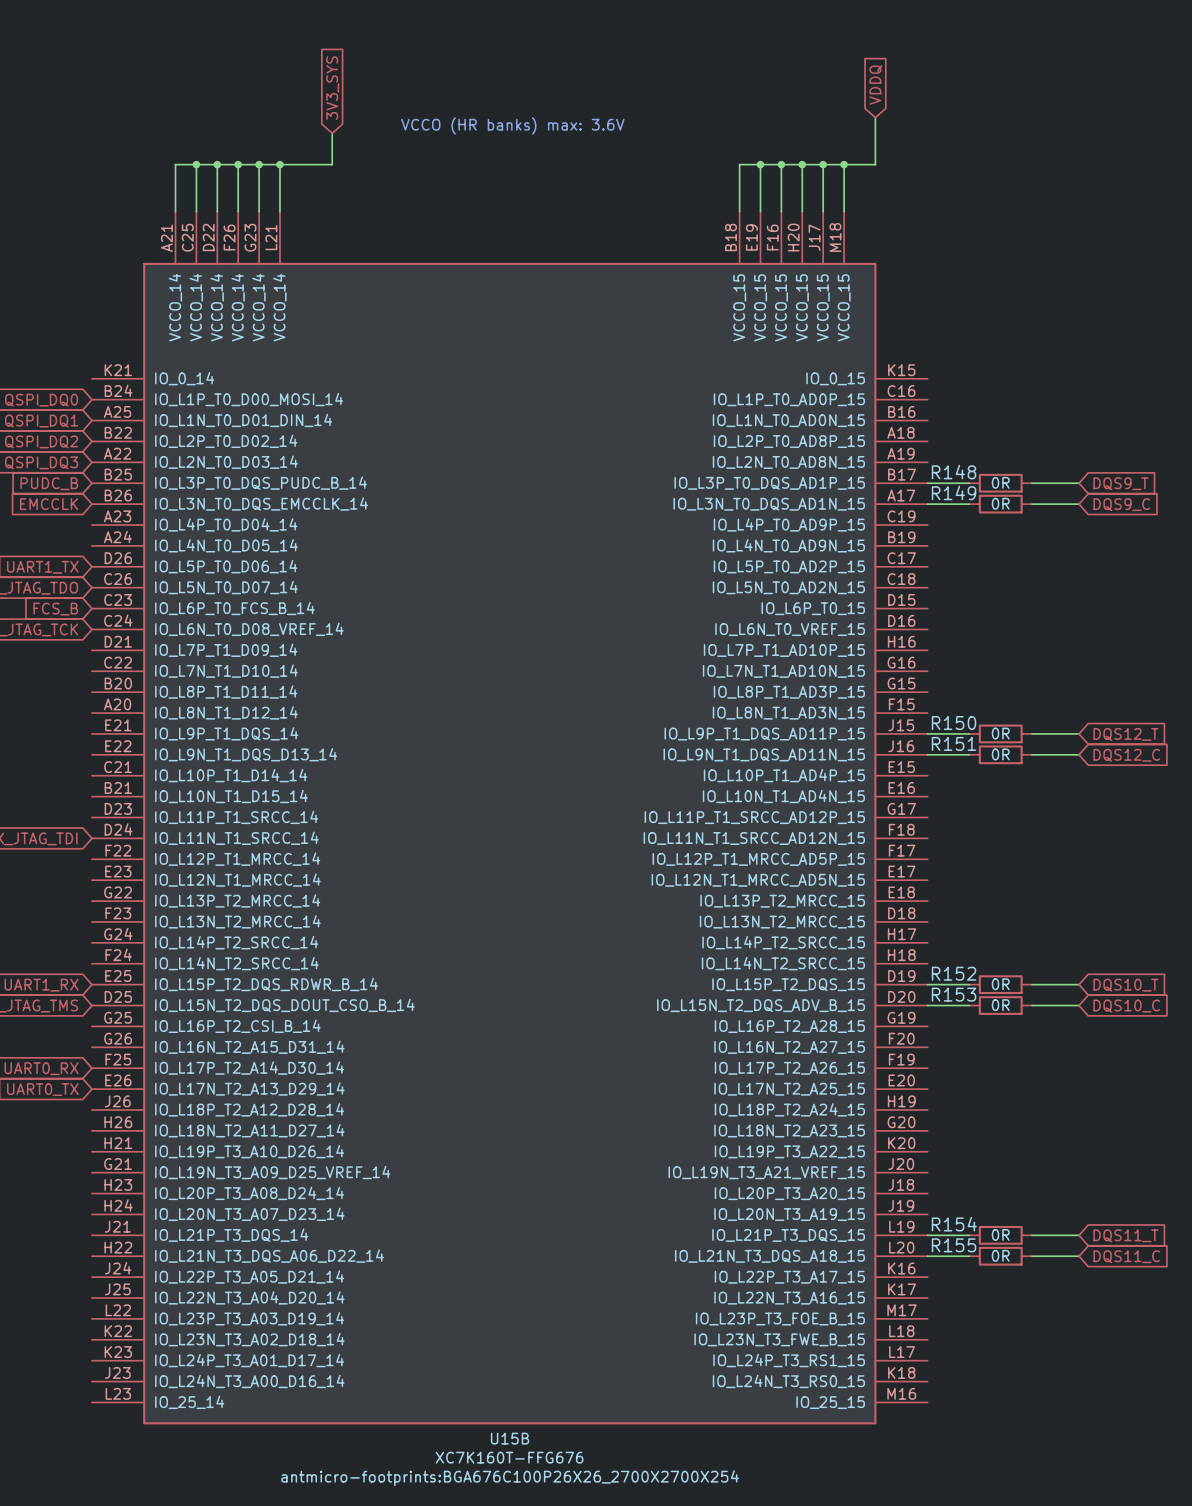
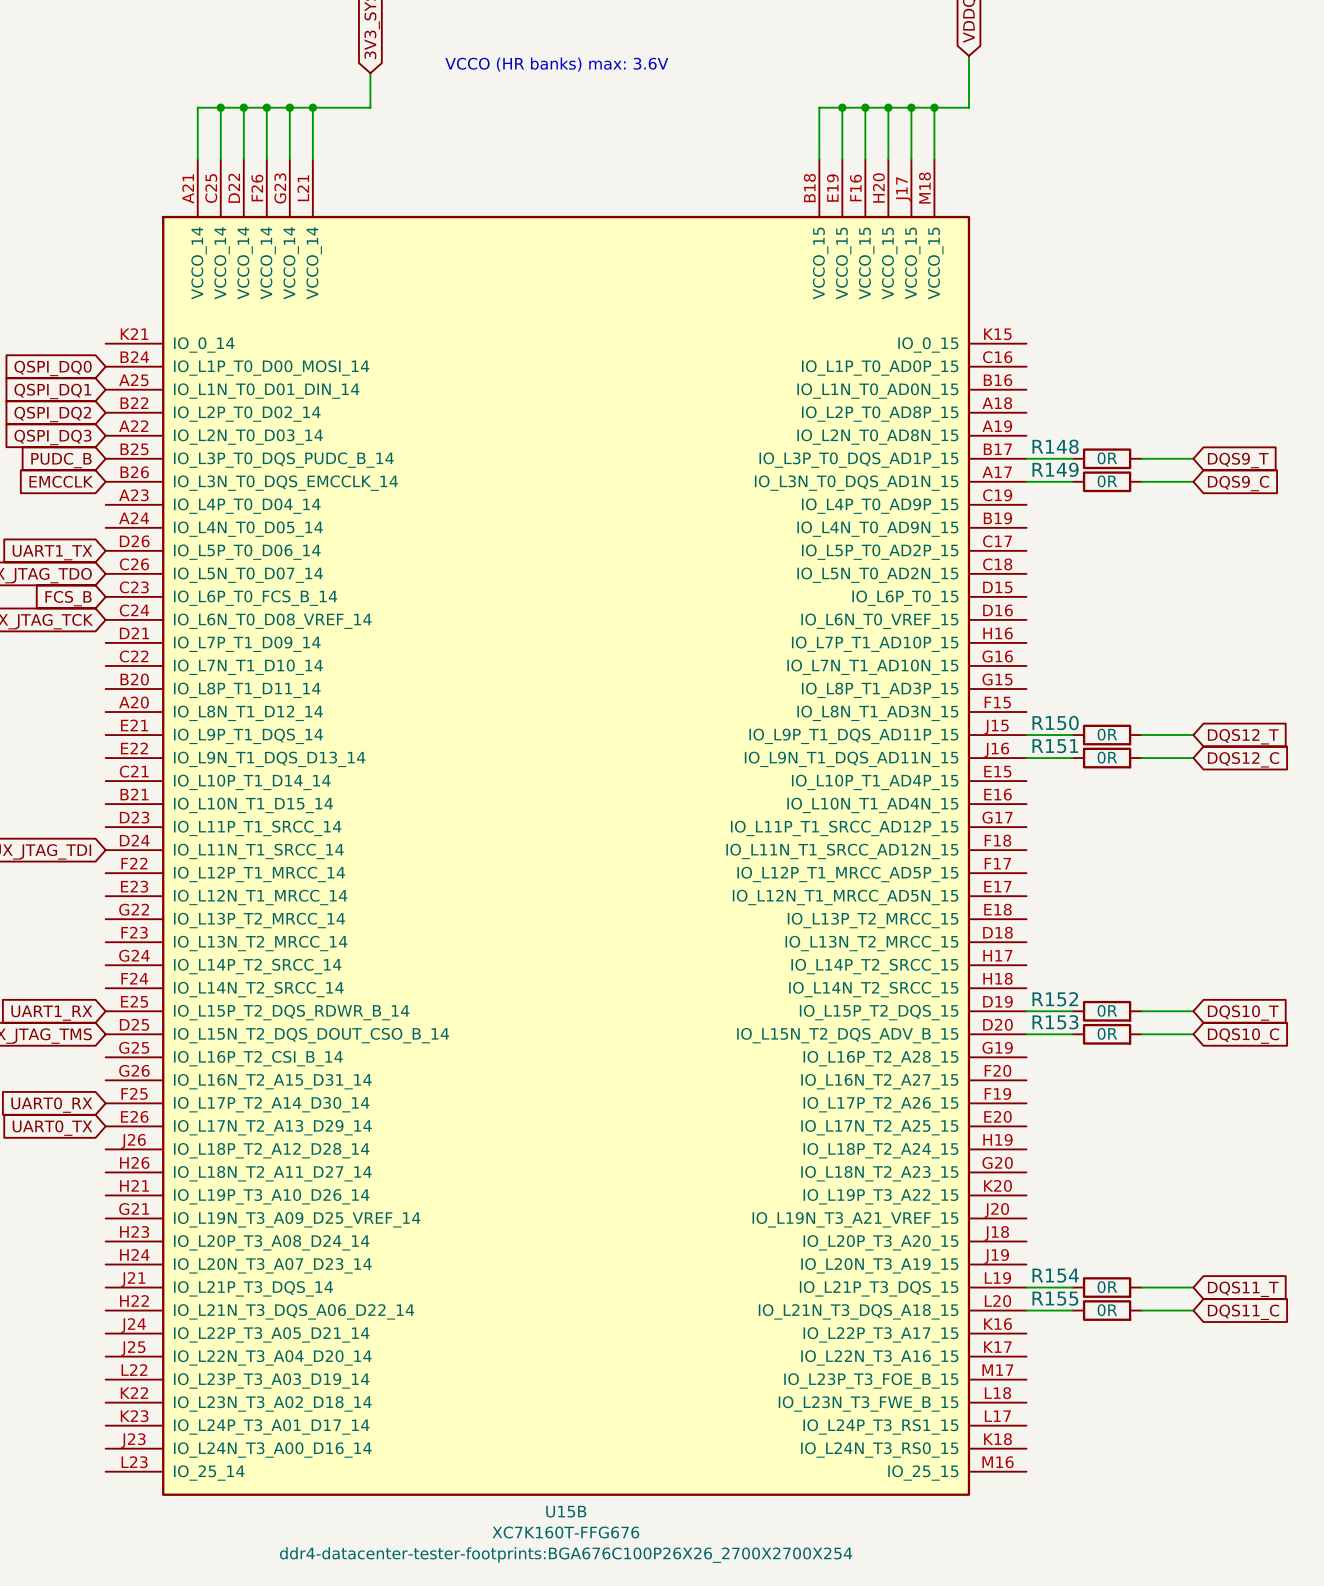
U15B text: antmicro-footprints:BGA676C100P26X26_2700X2700X254 (510, 1478) -> ddr4-datacenter-tester-footprints:BGA676C100P26X26_2700X2700X254 (566, 1555)

